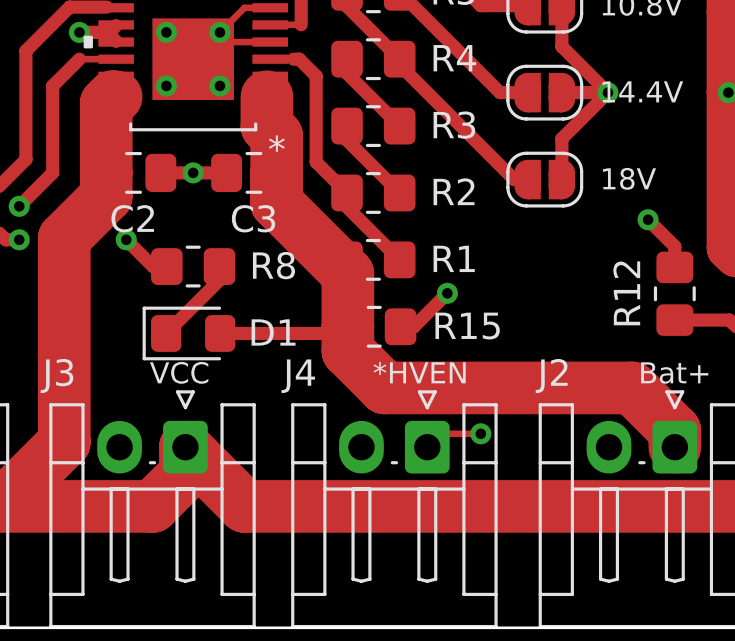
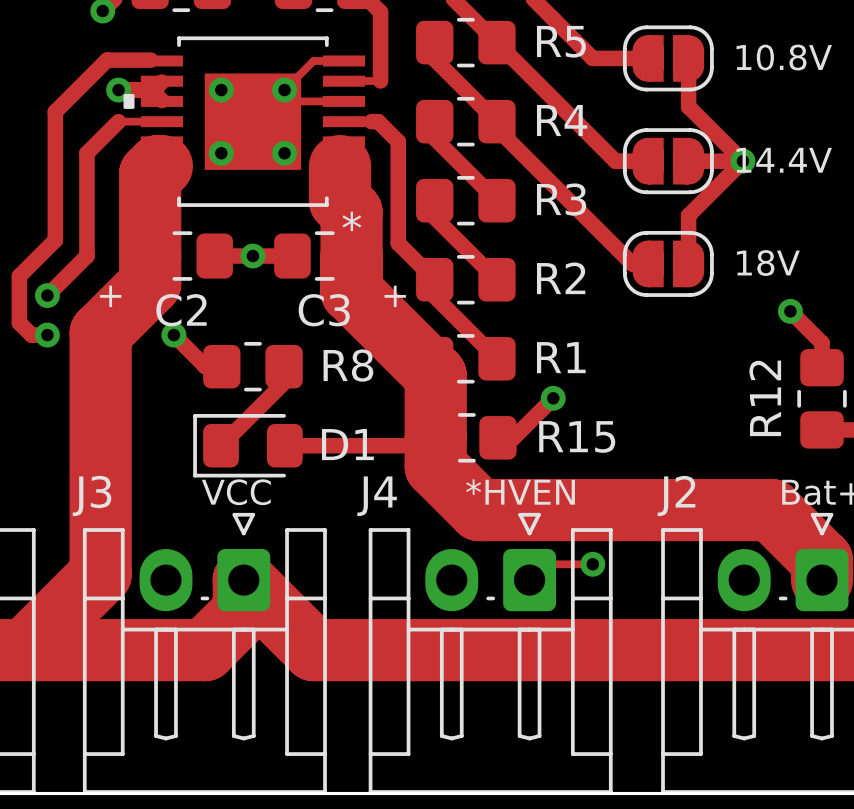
text: none -> + (110, 296)
text: none -> + (395, 296)

